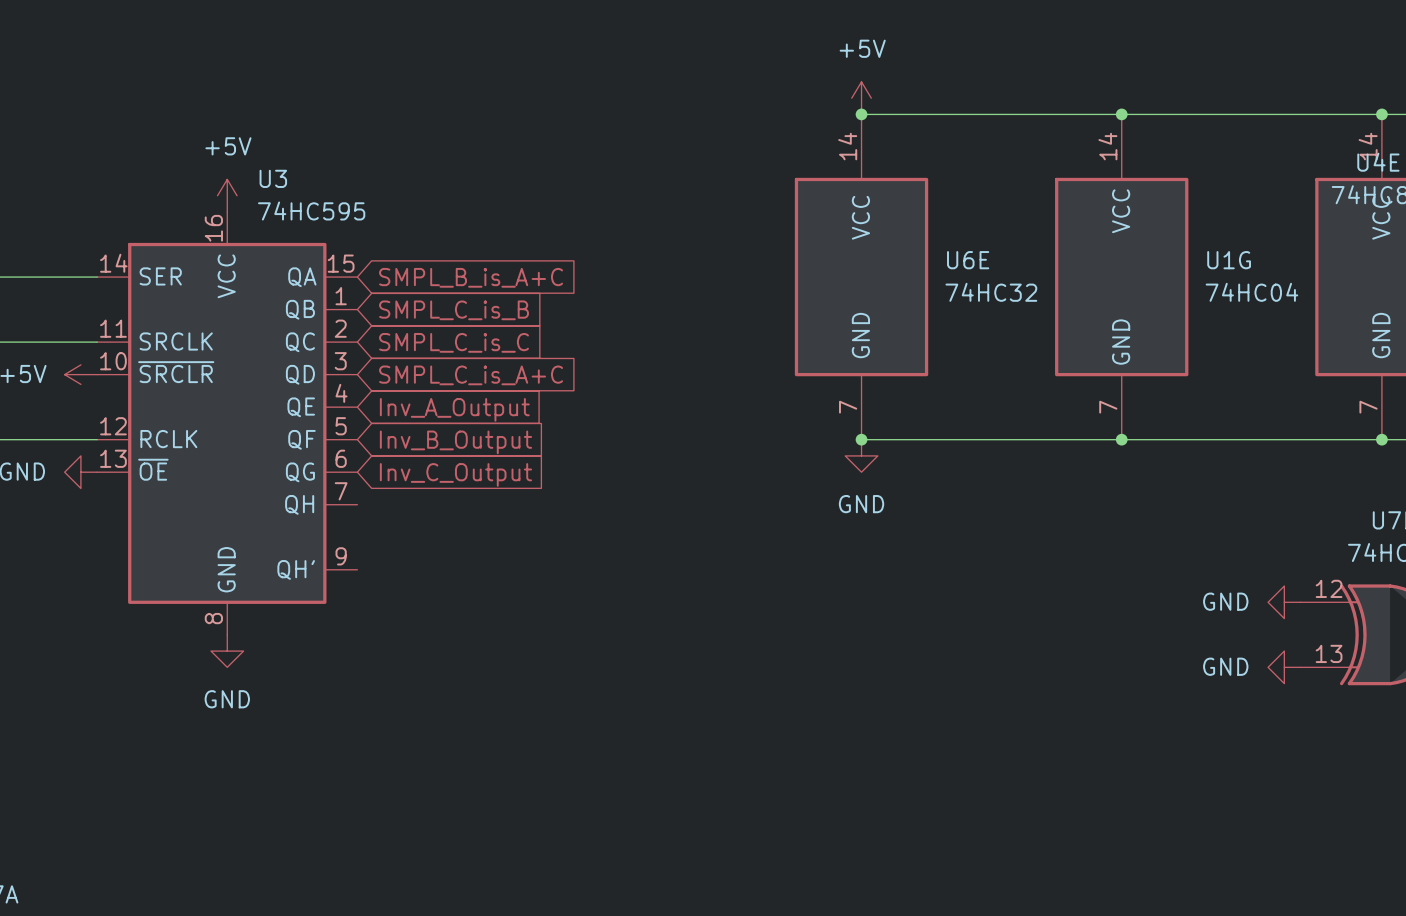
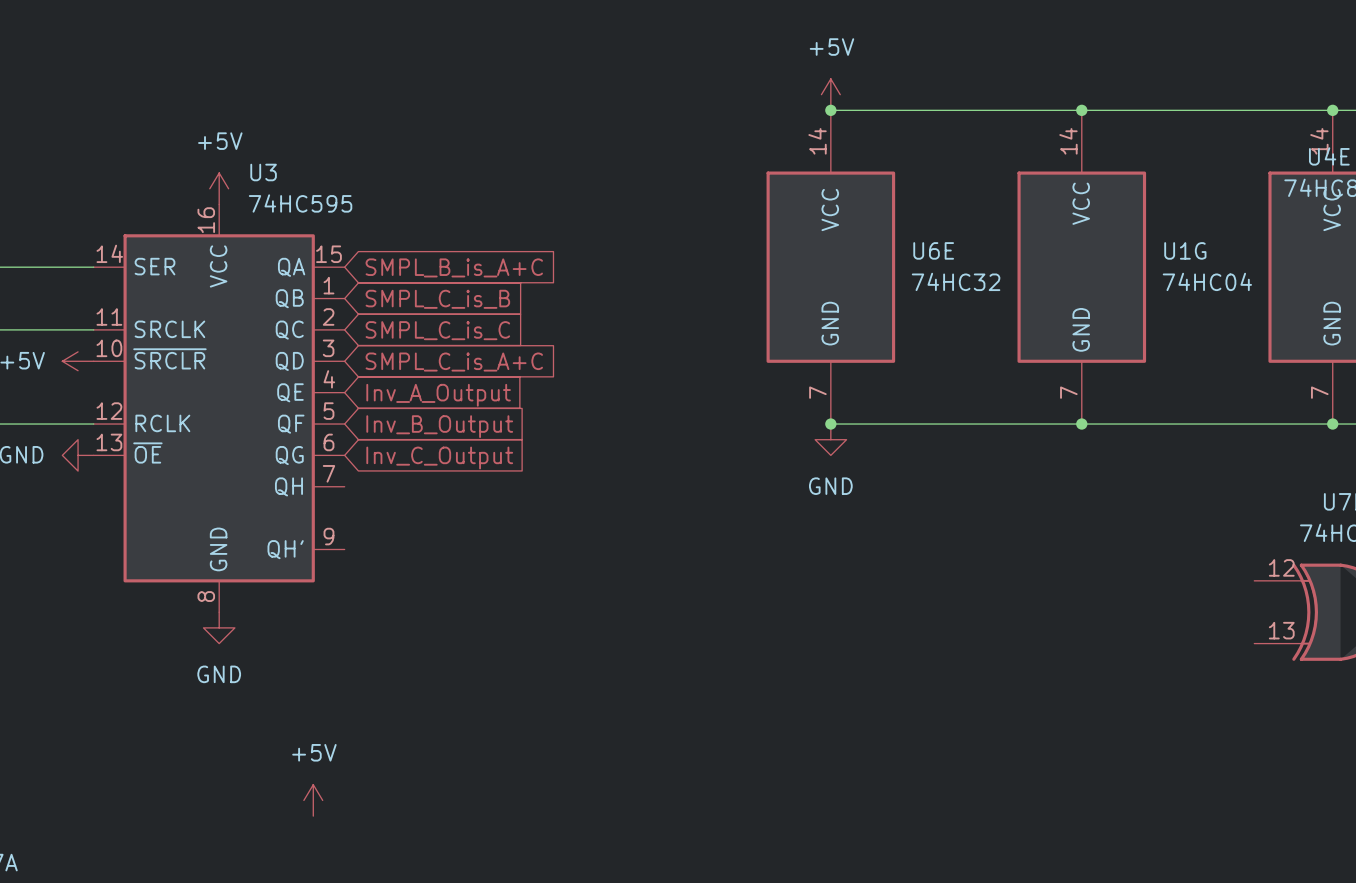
power symbol: GND (1284, 602) -> none
power symbol: GND (1284, 667) -> none
power symbol: none -> +5V (313, 800)

